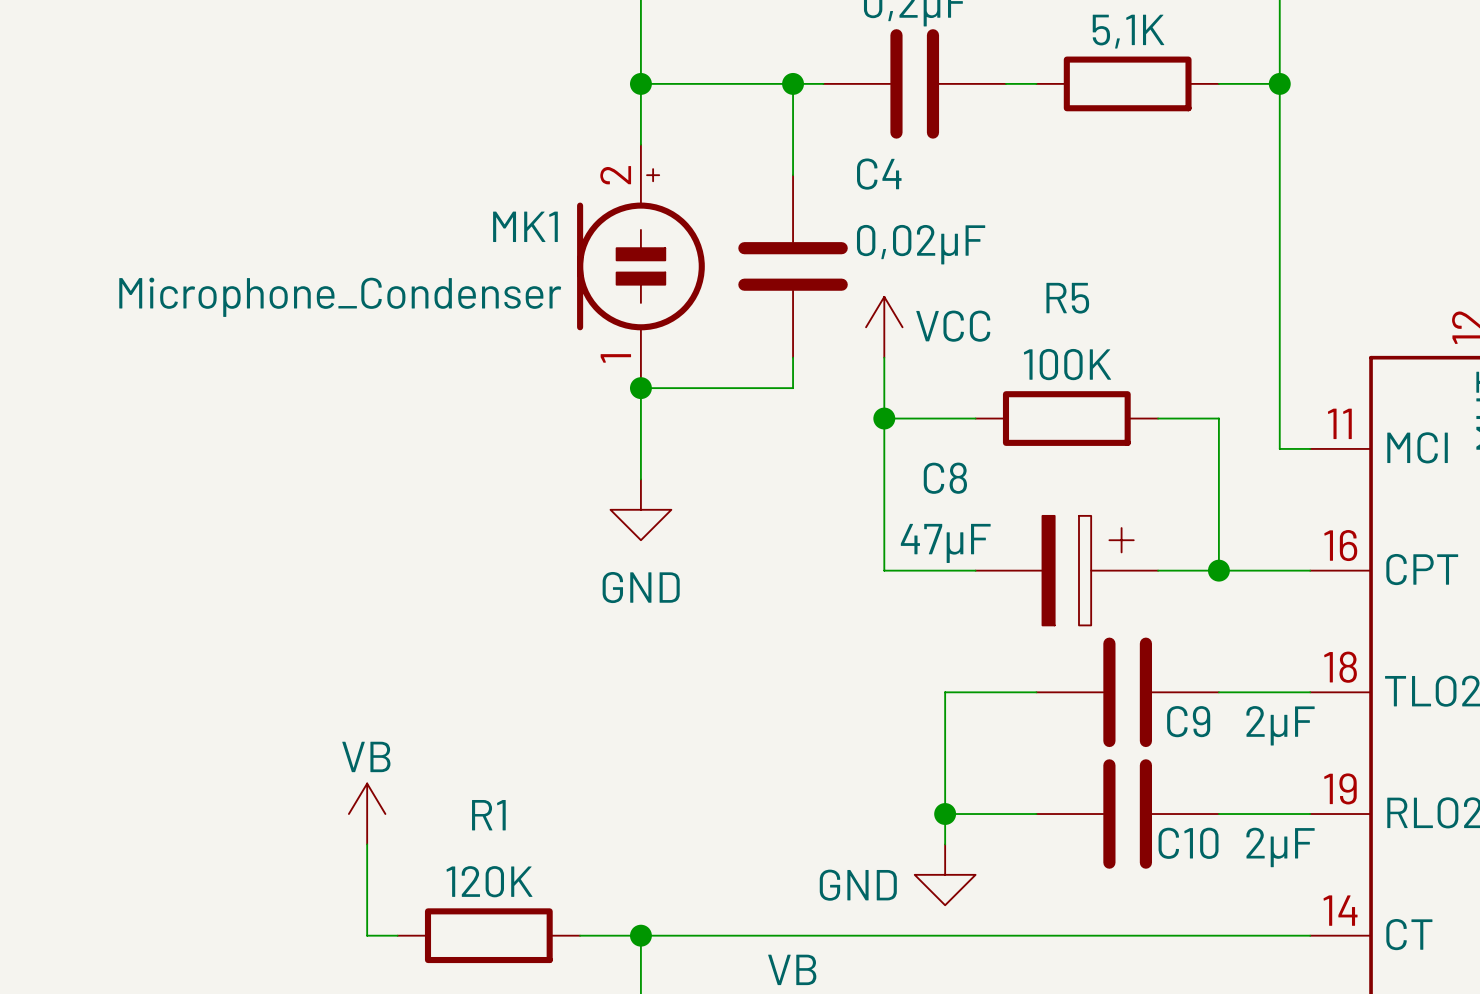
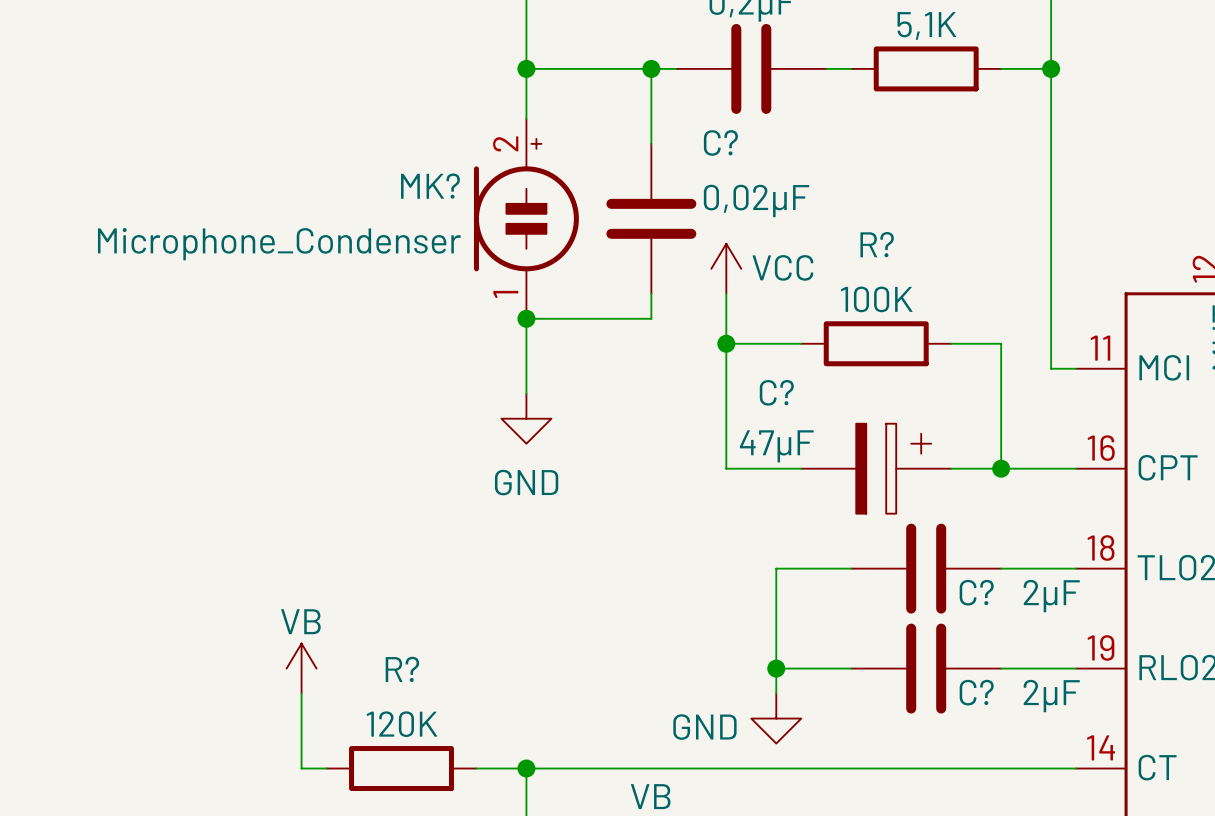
C4 name: C4 (879, 174) -> C? (720, 142)
MK1 name: MK1 (525, 226) -> MK? (430, 186)
R5 name: R5 (1067, 298) -> R? (877, 244)
C8 name: C8 (945, 478) -> C? (776, 392)
C9 name: C9 (1188, 721) -> C? (976, 592)
R1 name: R1 (488, 815) -> R? (402, 669)
C10 name: C10 (1188, 843) -> C? (976, 692)

